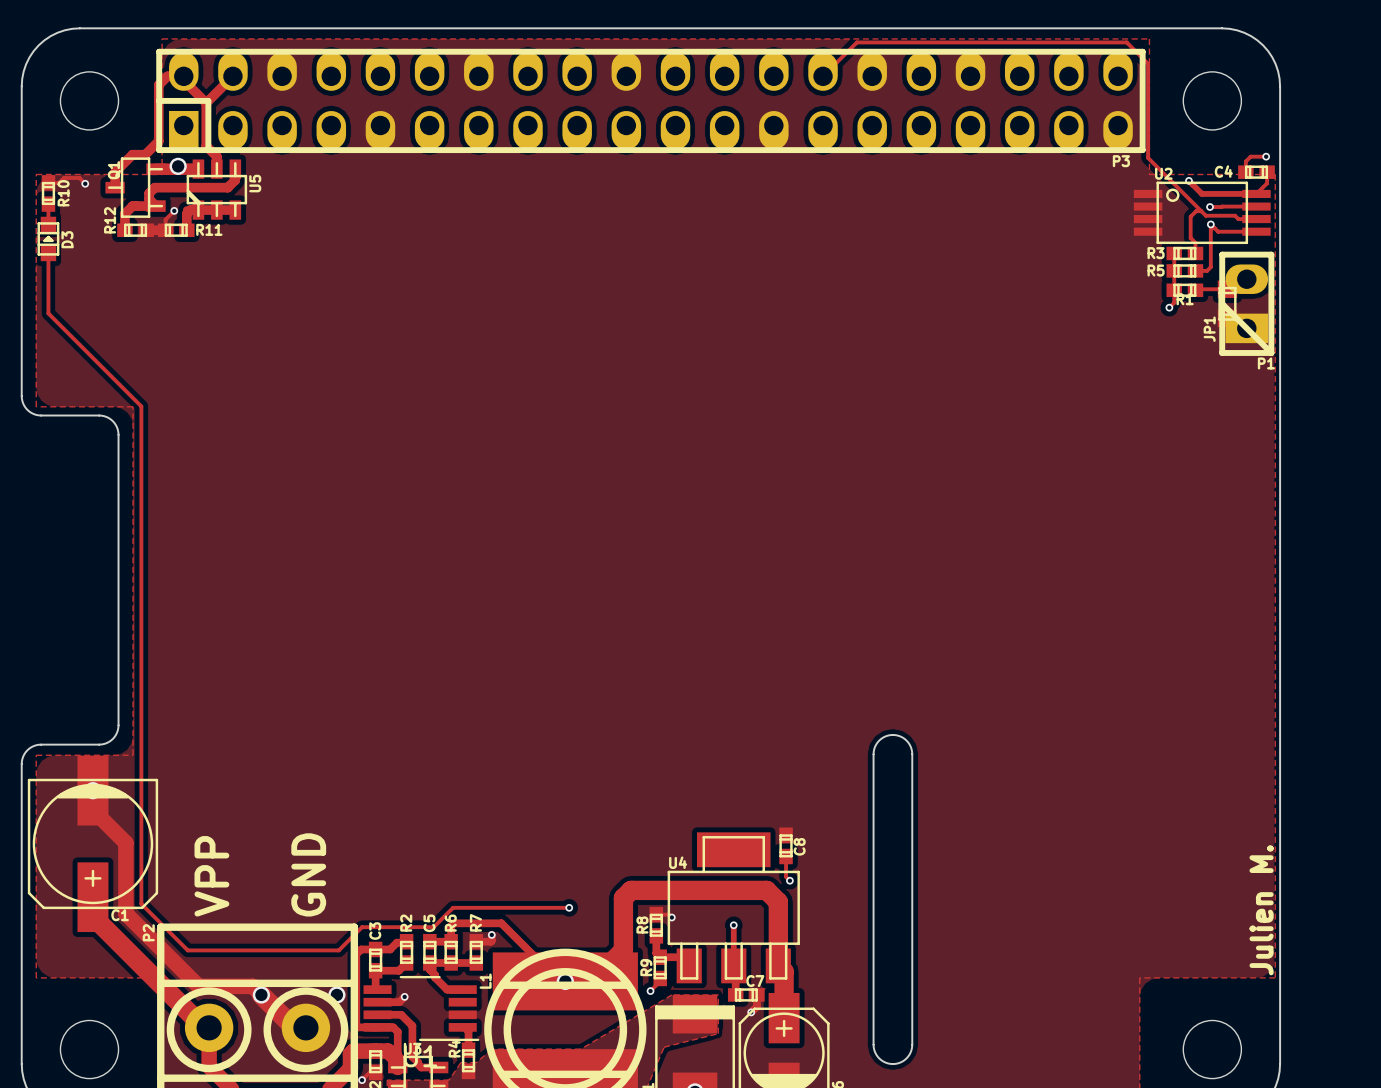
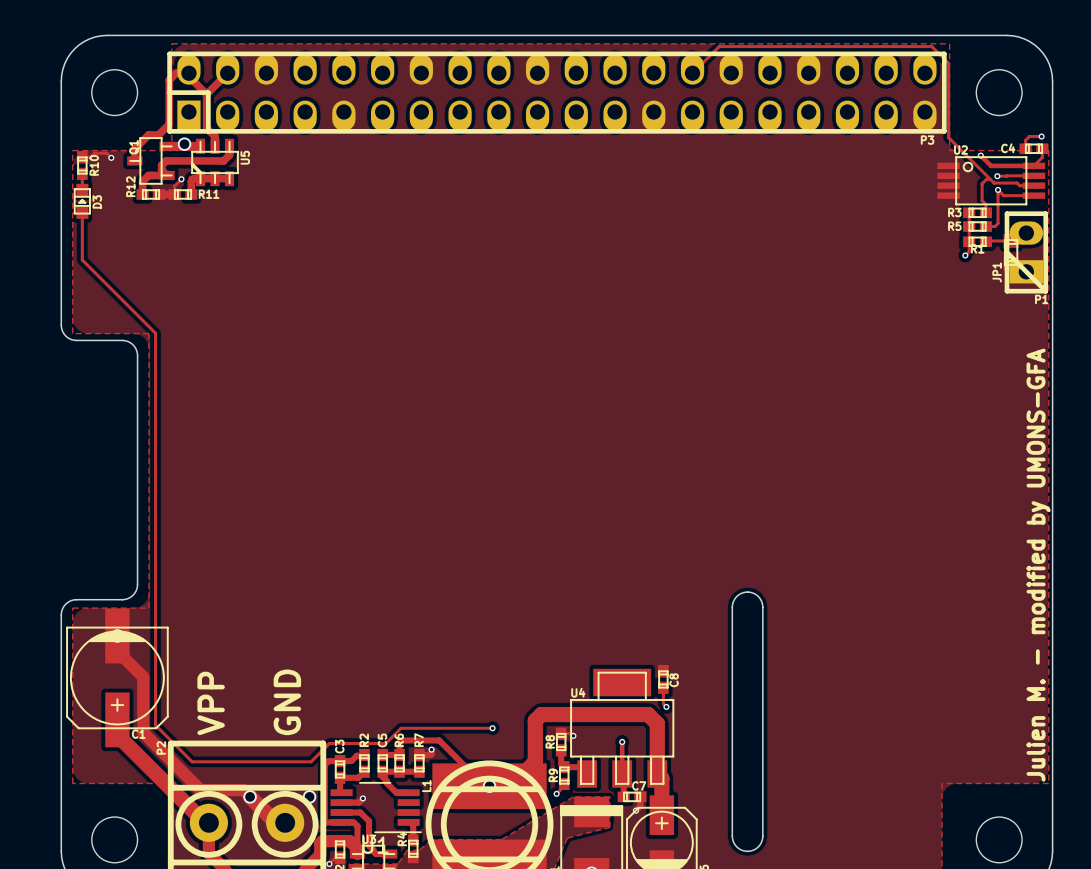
text: none -> Julien M. - modified by UMONS-GFA (1038, 565)
text: Julien M. (1261, 910) -> none

